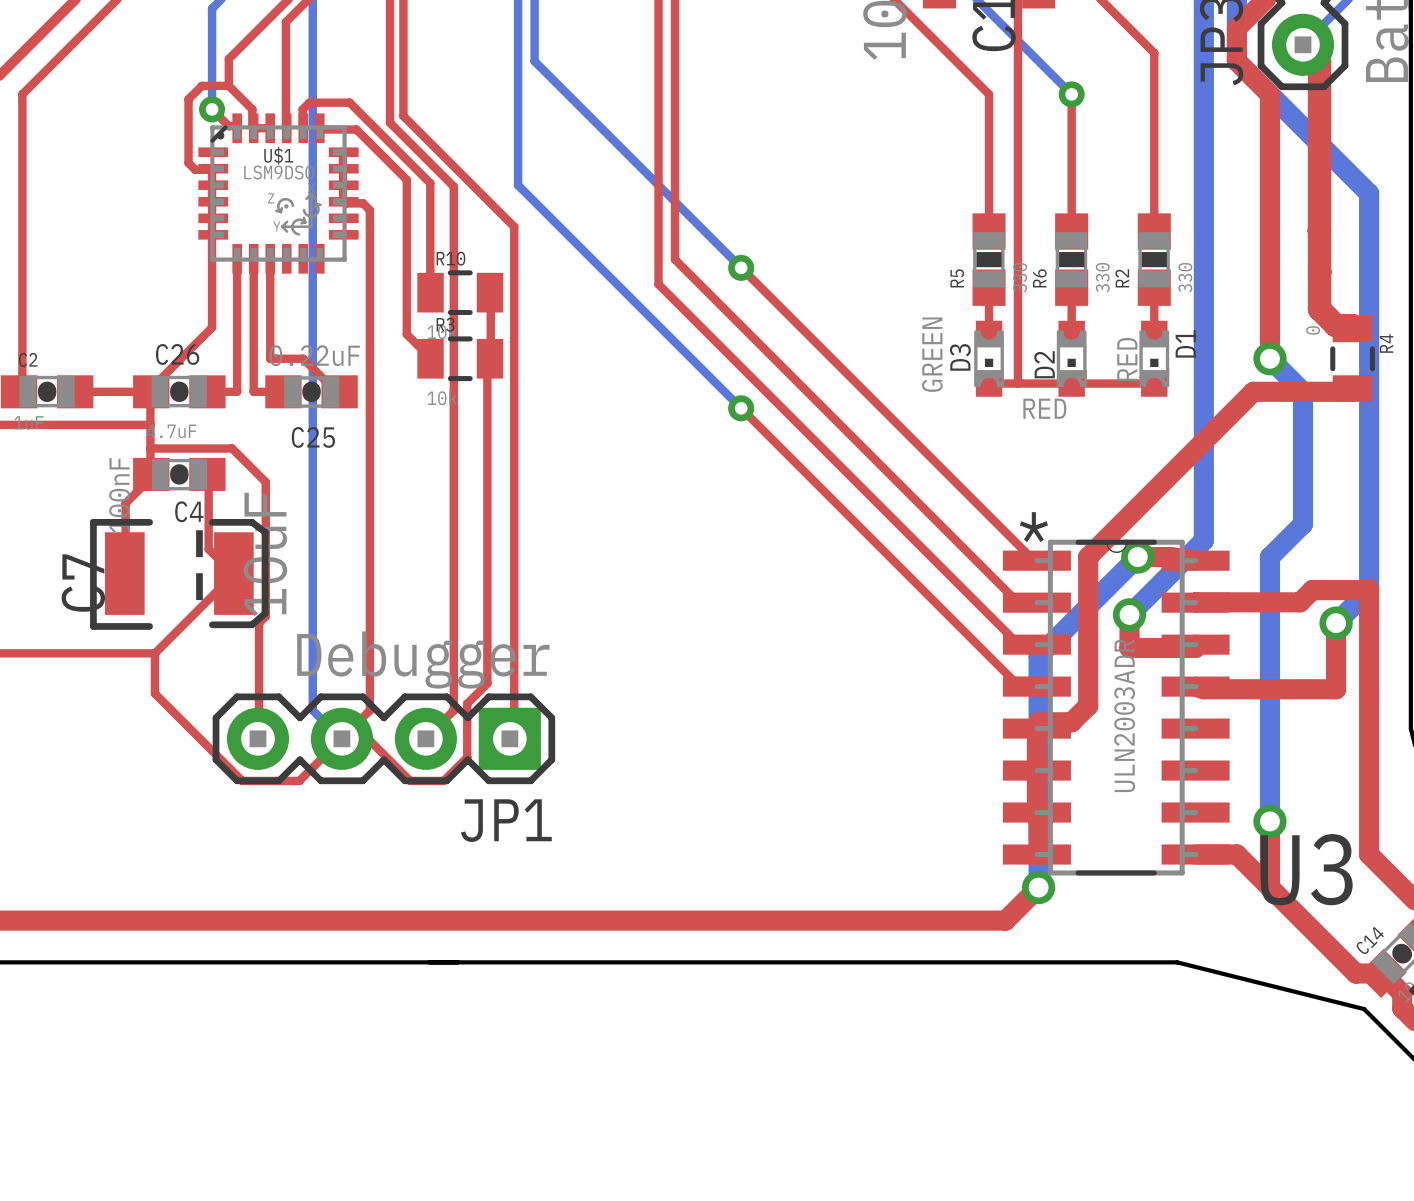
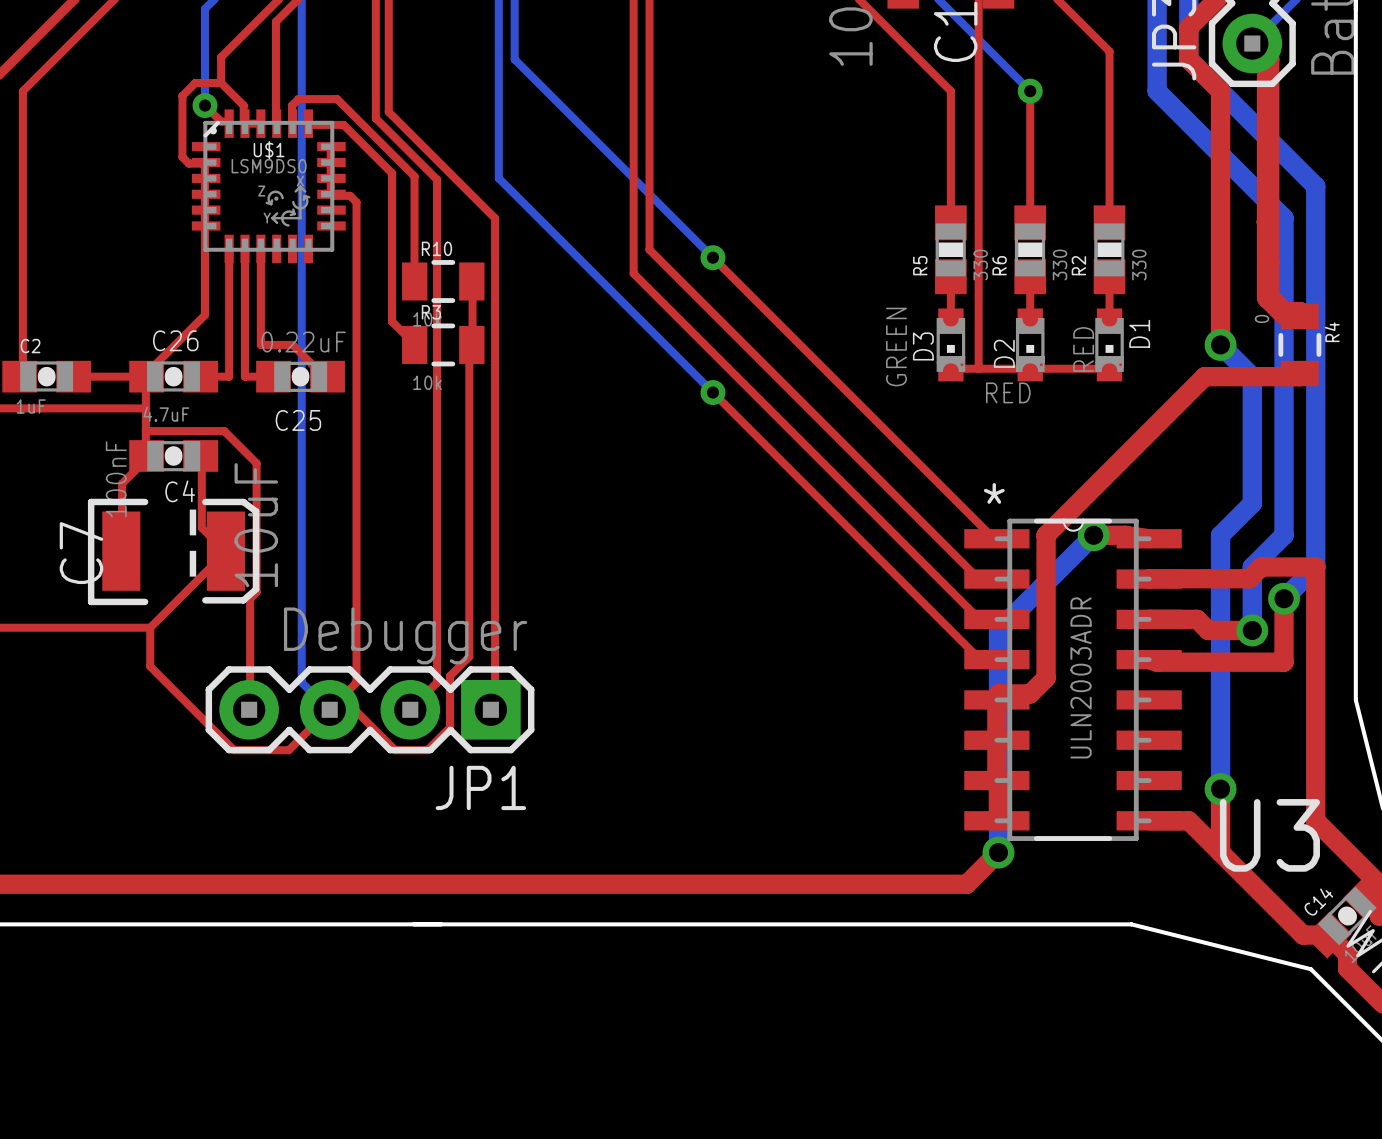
bottom track: (1203, 94) (1203, 540) (1129, 614) -> (1157, 91) (1284, 218) (1284, 535) (1252, 567) (1252, 630)
top track: (1129, 614) (1129, 647) (1195, 647) (1195, 644) -> (1252, 630) (1208, 630) (1197, 619) (1149, 619)
via position: (1129, 614) -> (1252, 630)

